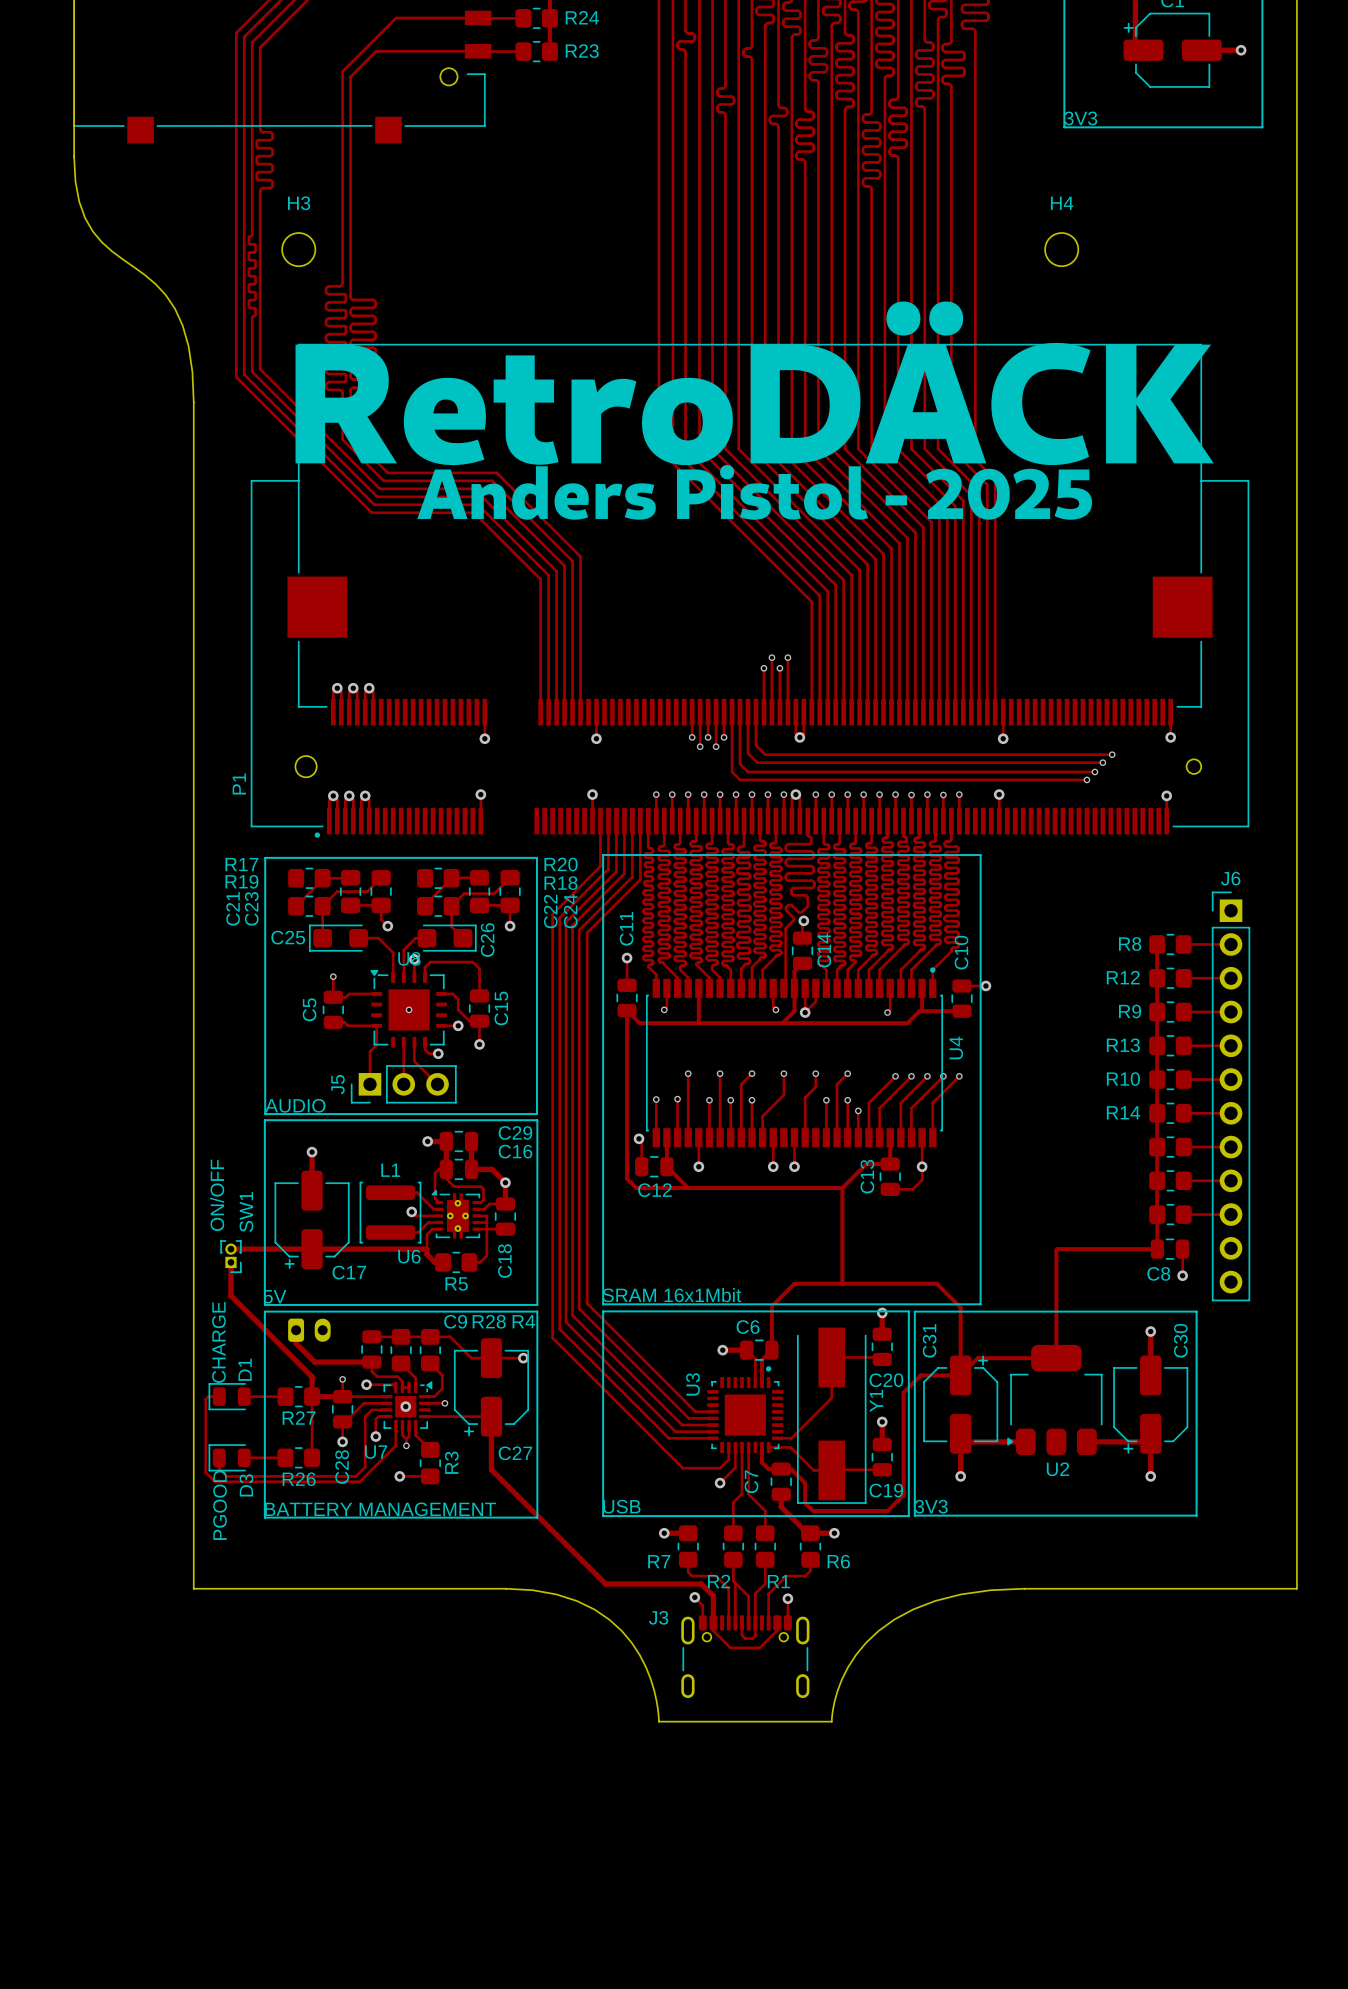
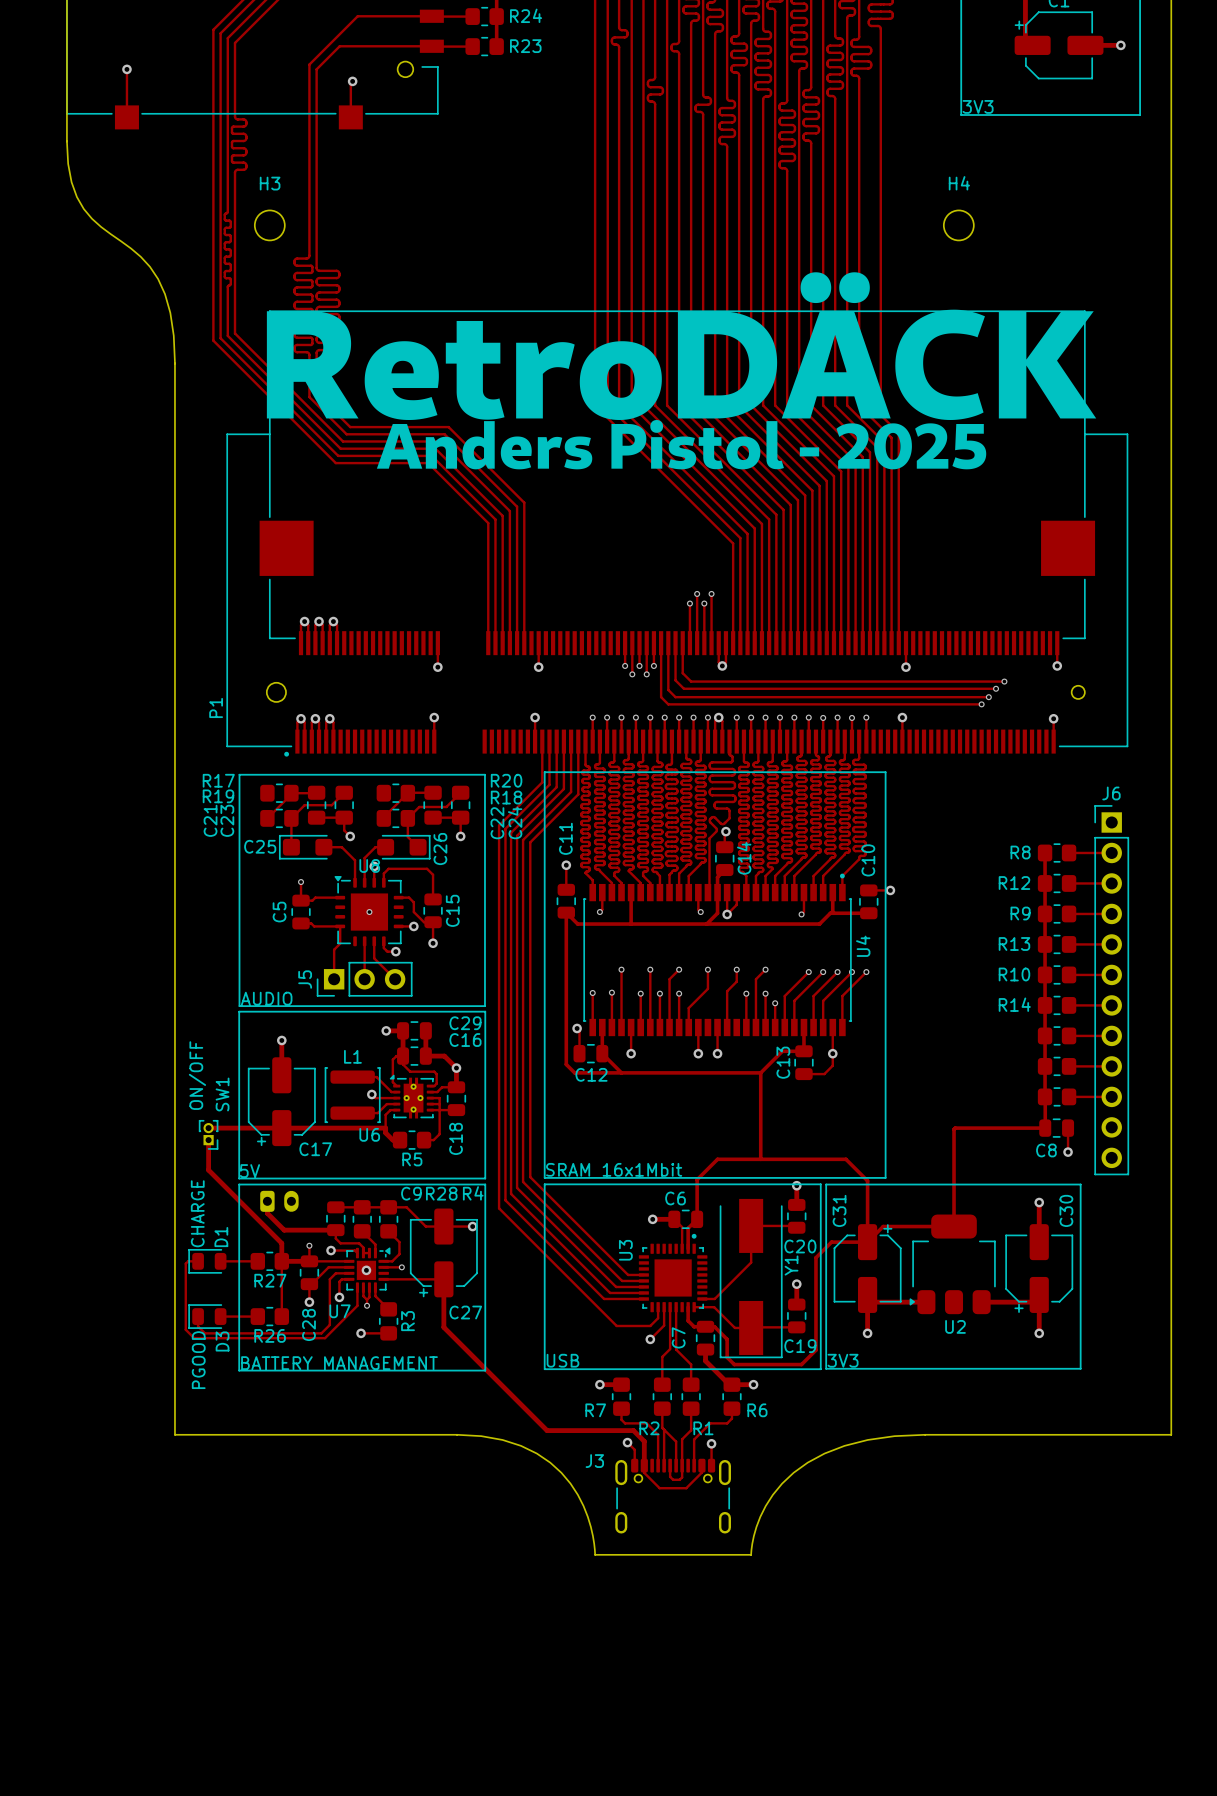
track: none -> (126, 69) (126, 117)
via: none -> (126, 69)
track: none -> (352, 81) (350, 83) (350, 117)
via: none -> (352, 81)

